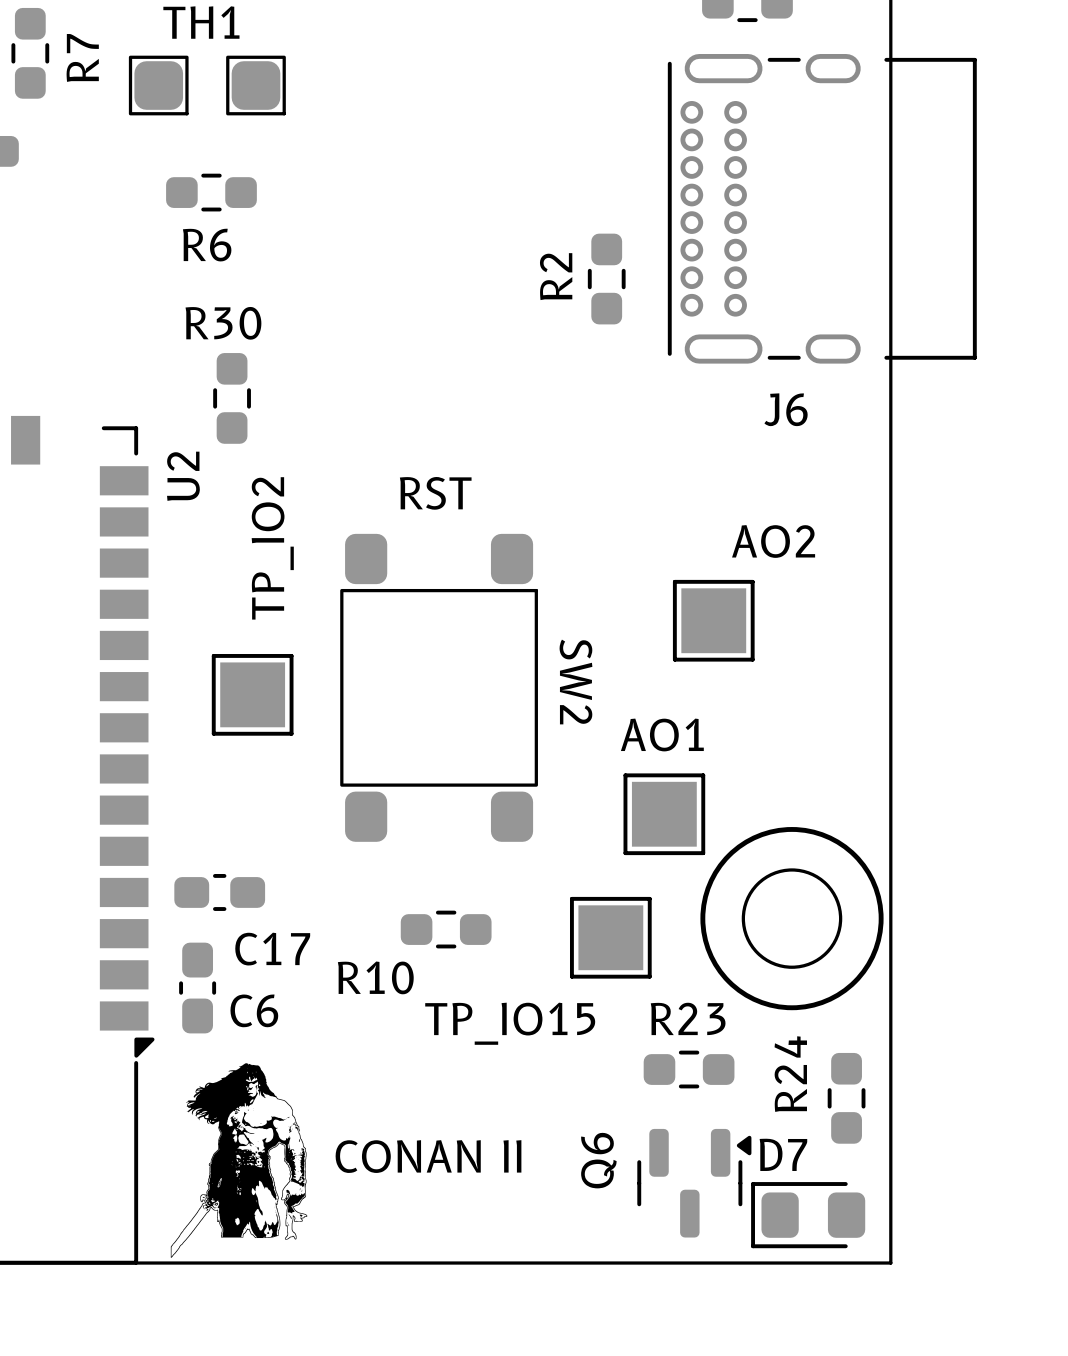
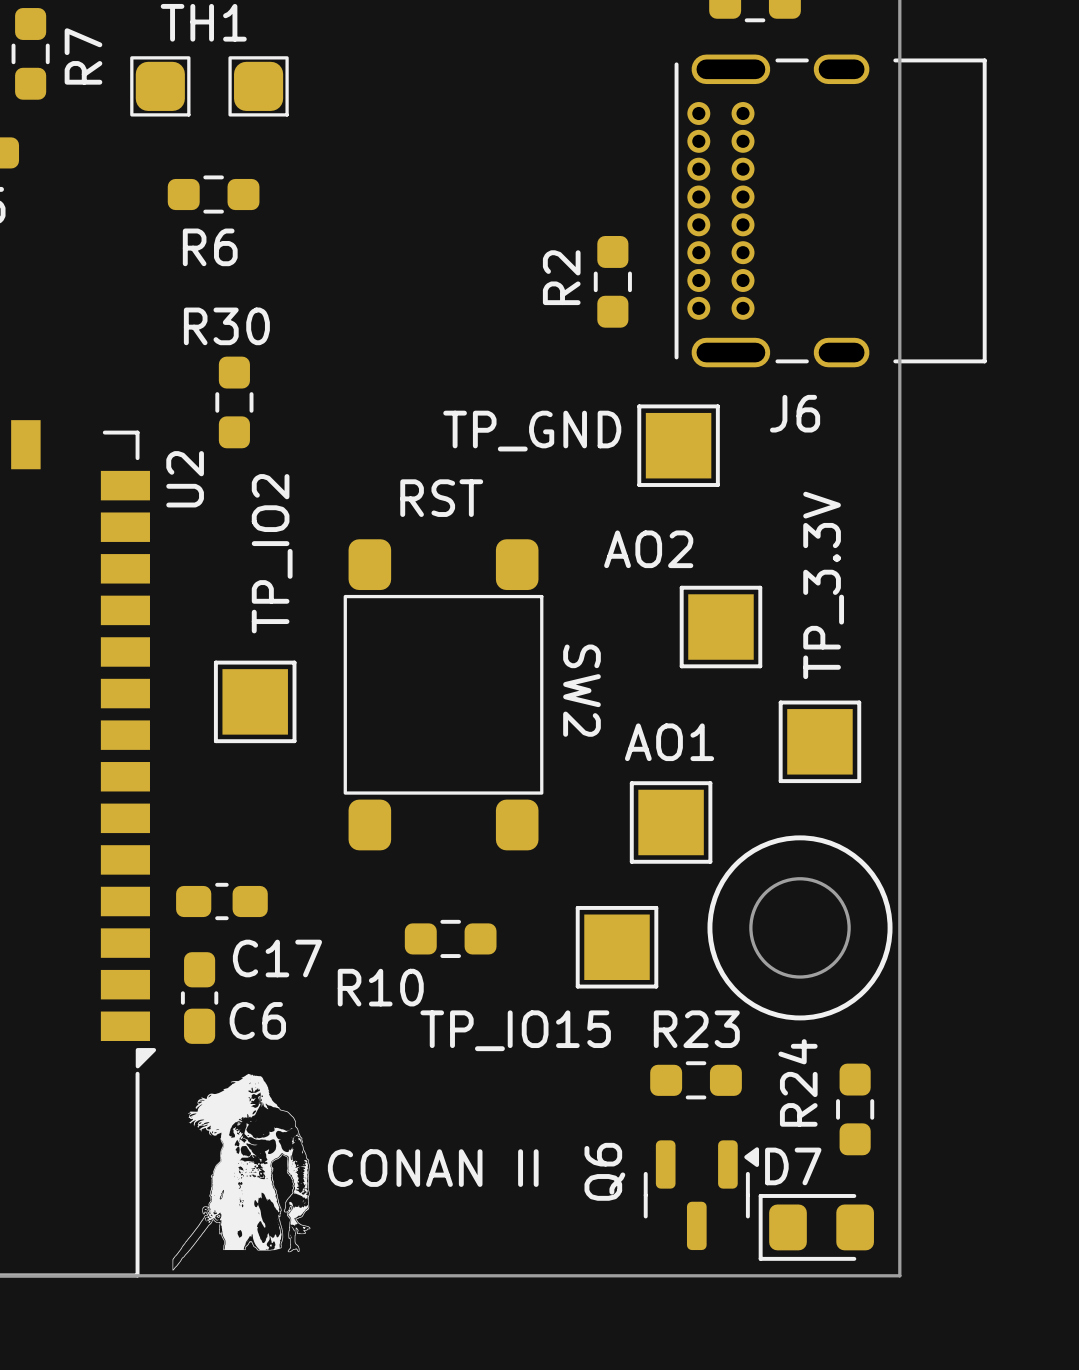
part: none -> TP_GND (678, 445)
AO2 name position: AO2 (773, 541) -> AO2 (648, 549)
part: none -> TP_3.3V (819, 741)

